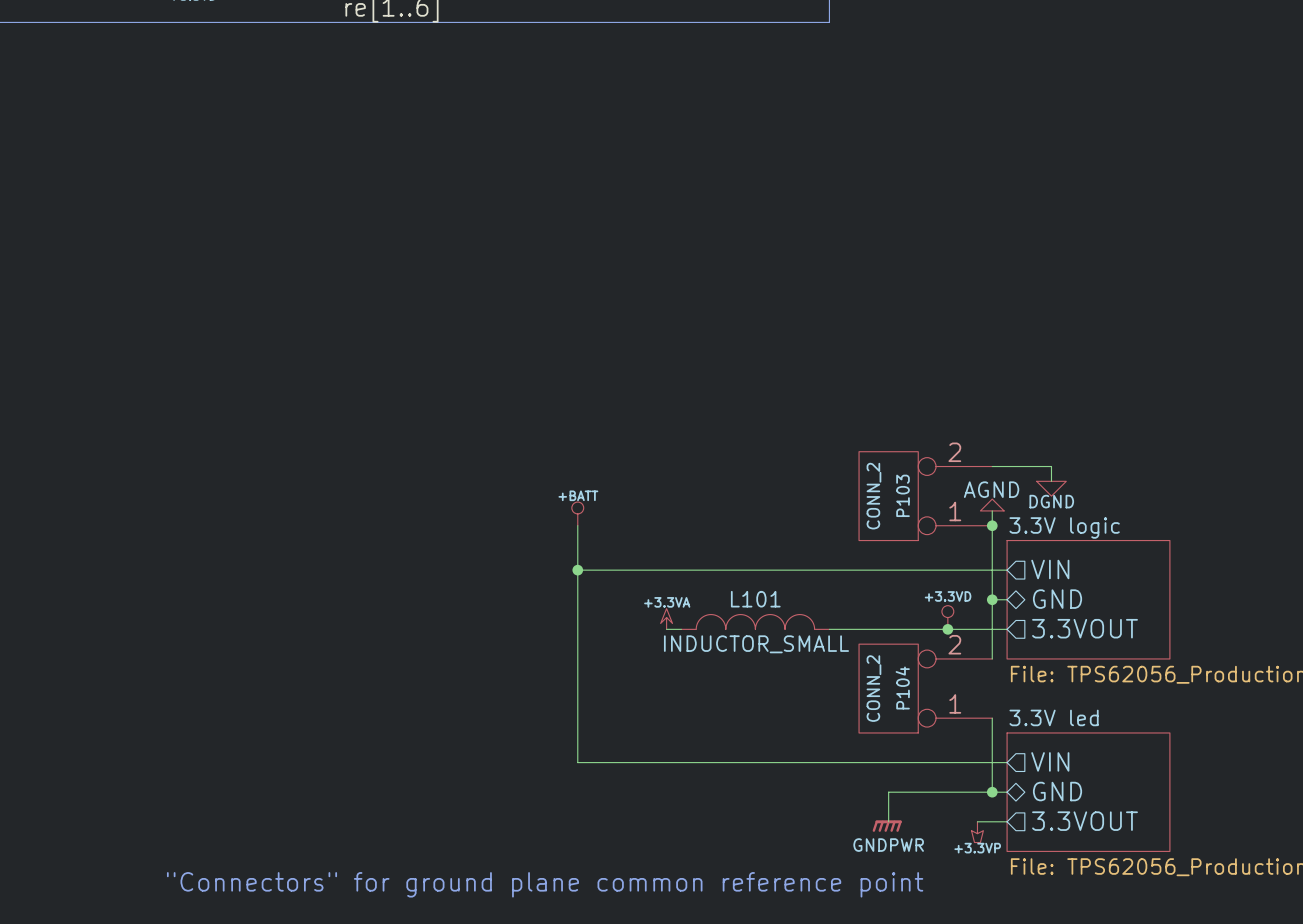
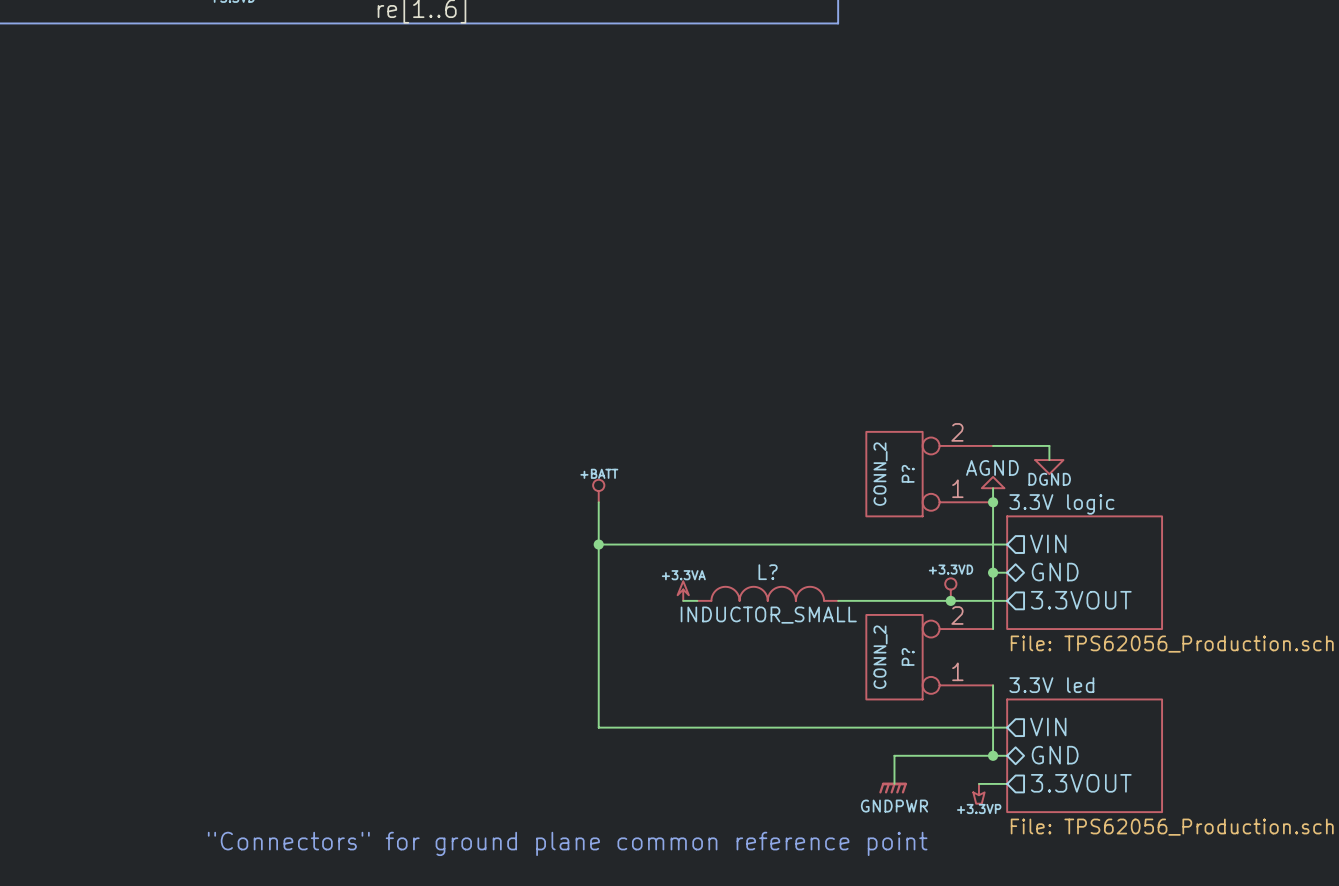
P103 name: P103 (903, 495) -> P? (908, 473)
L101 name: L101 (755, 599) -> L? (768, 572)
P104 name: P104 (902, 688) -> P? (908, 656)

